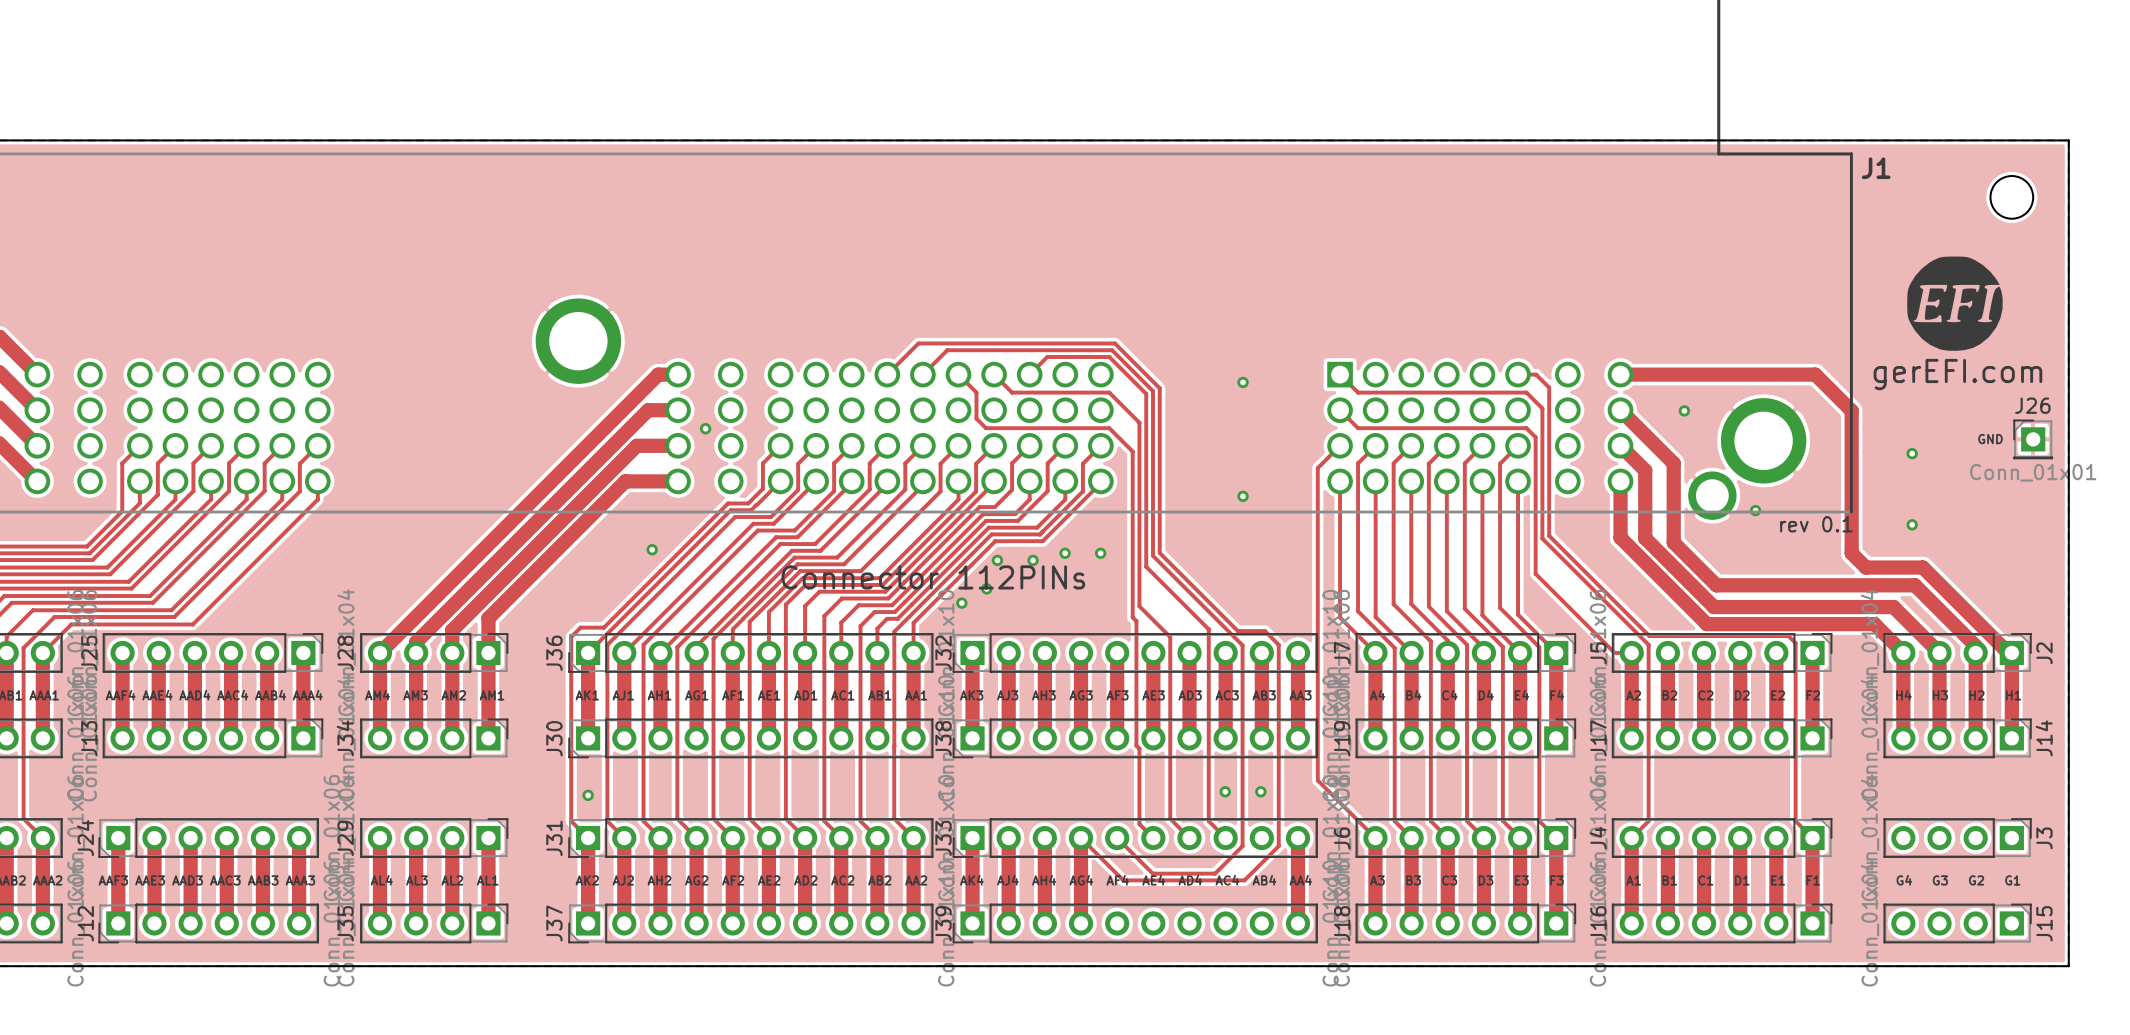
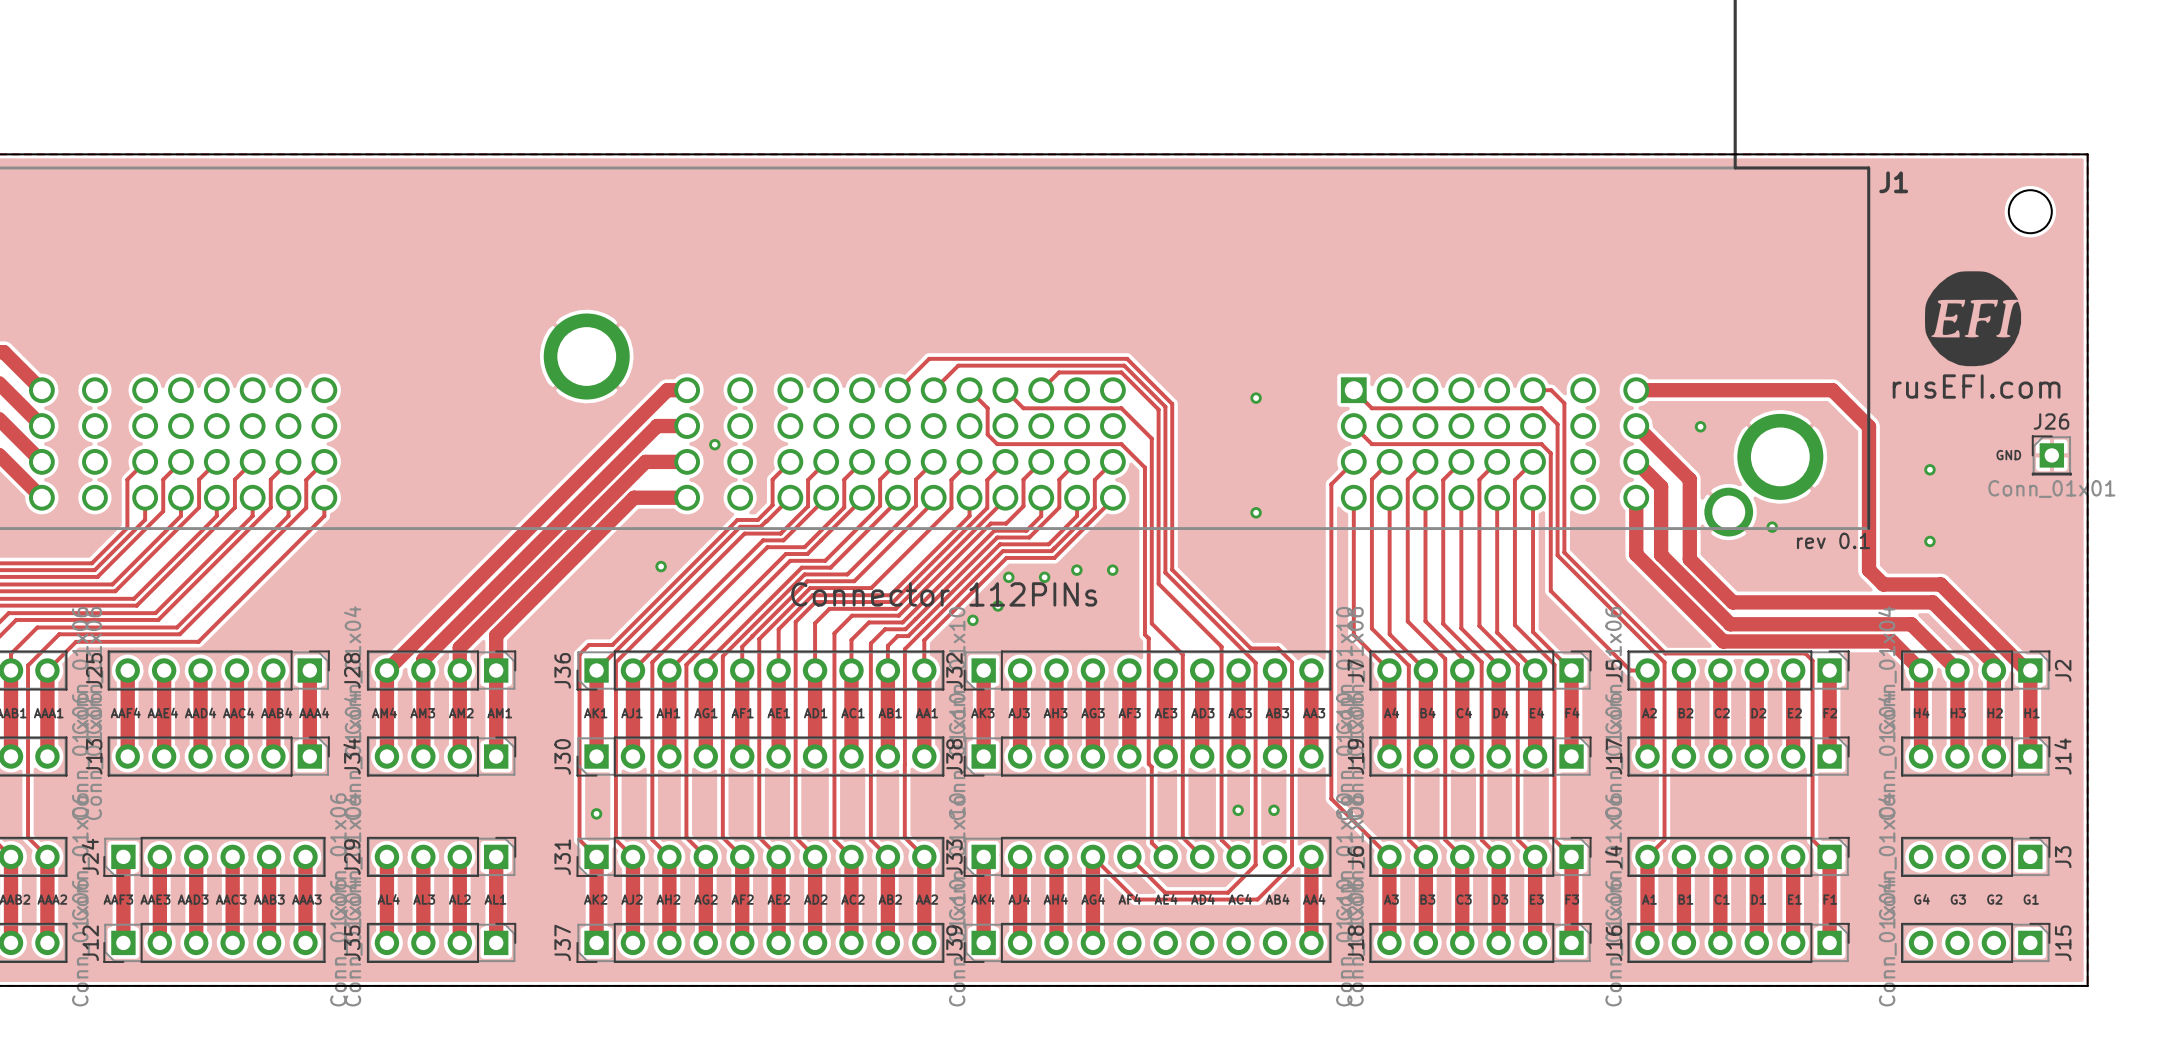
text: gerEFI.com (1957, 374) -> rusEFI.com (1976, 386)

